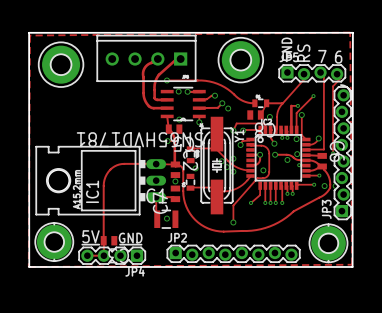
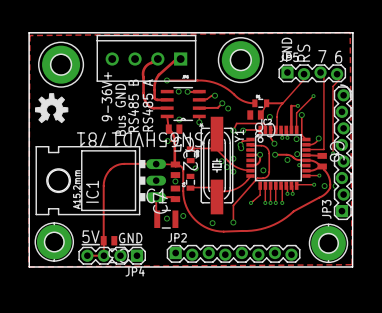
drawing: none -> [35, 93, 69, 124]
text: none -> 9-36V+ (106, 96)
text: none -> RS485 B (133, 105)
text: none -> RS485 A (147, 105)
text: none -> Bus GND (120, 109)
via: none -> (241, 148)
via: none -> (183, 215)
via: none -> (212, 223)

